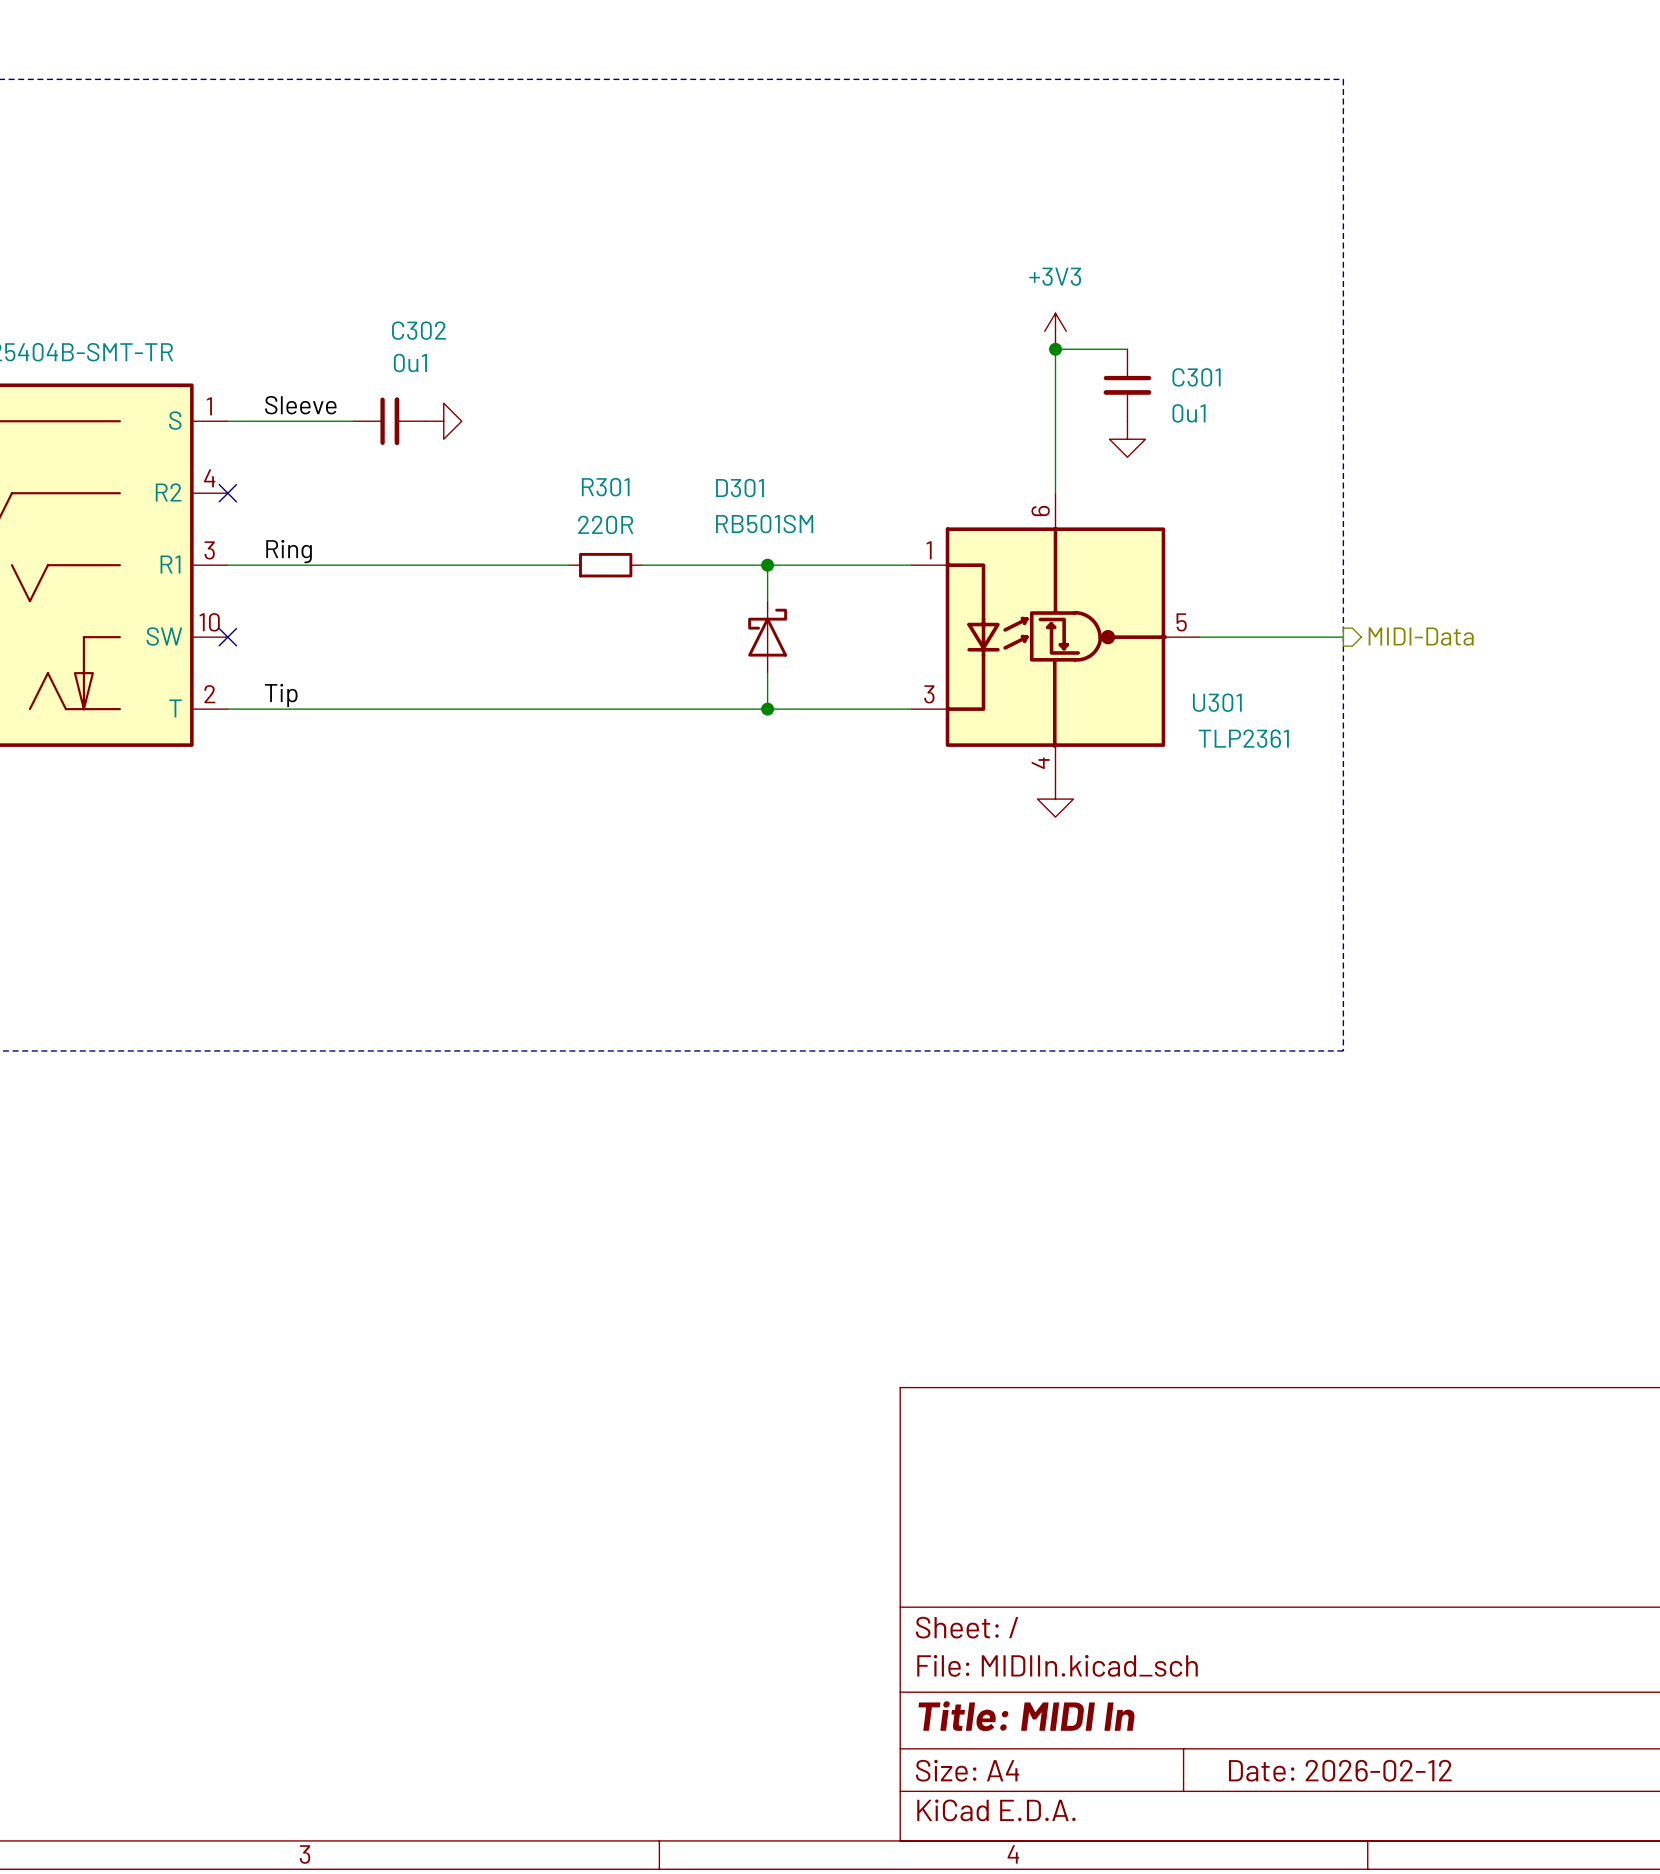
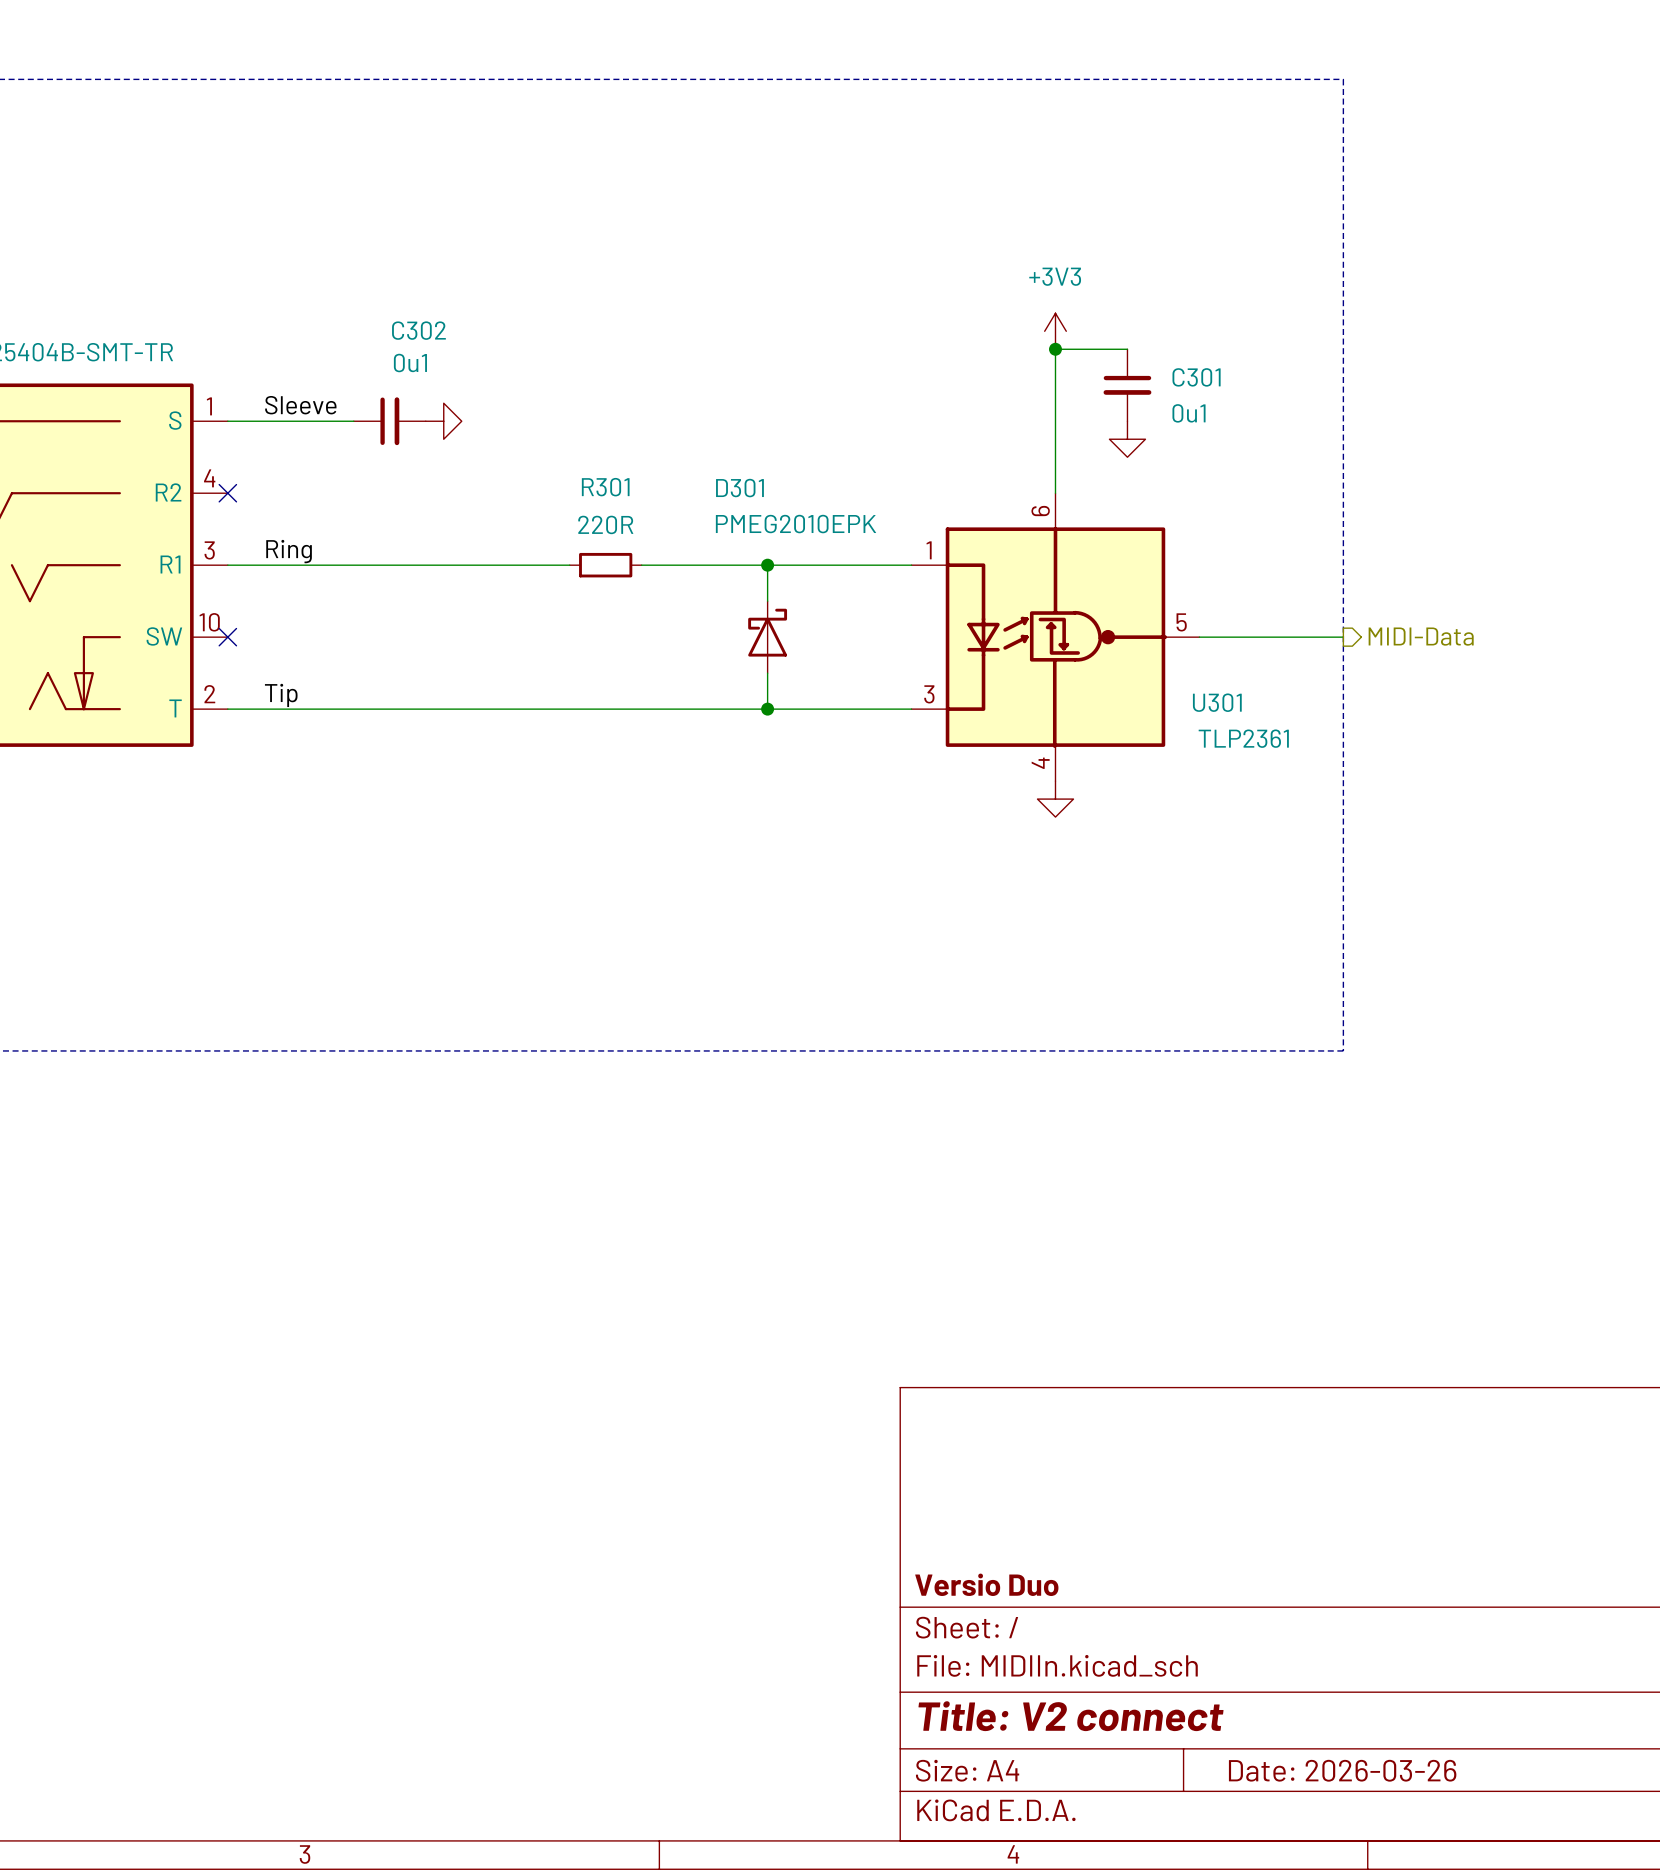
D301 value: RB501SM (764, 524) -> PMEG2010EPK (796, 524)
title block: none -> Versio Duo (986, 1584)
title block: Title: MIDI In (1026, 1716) -> Title: V2 connect (1071, 1716)
title block: Date: 2026-02-12 (1340, 1770) -> Date: 2026-03-26 (1342, 1770)

